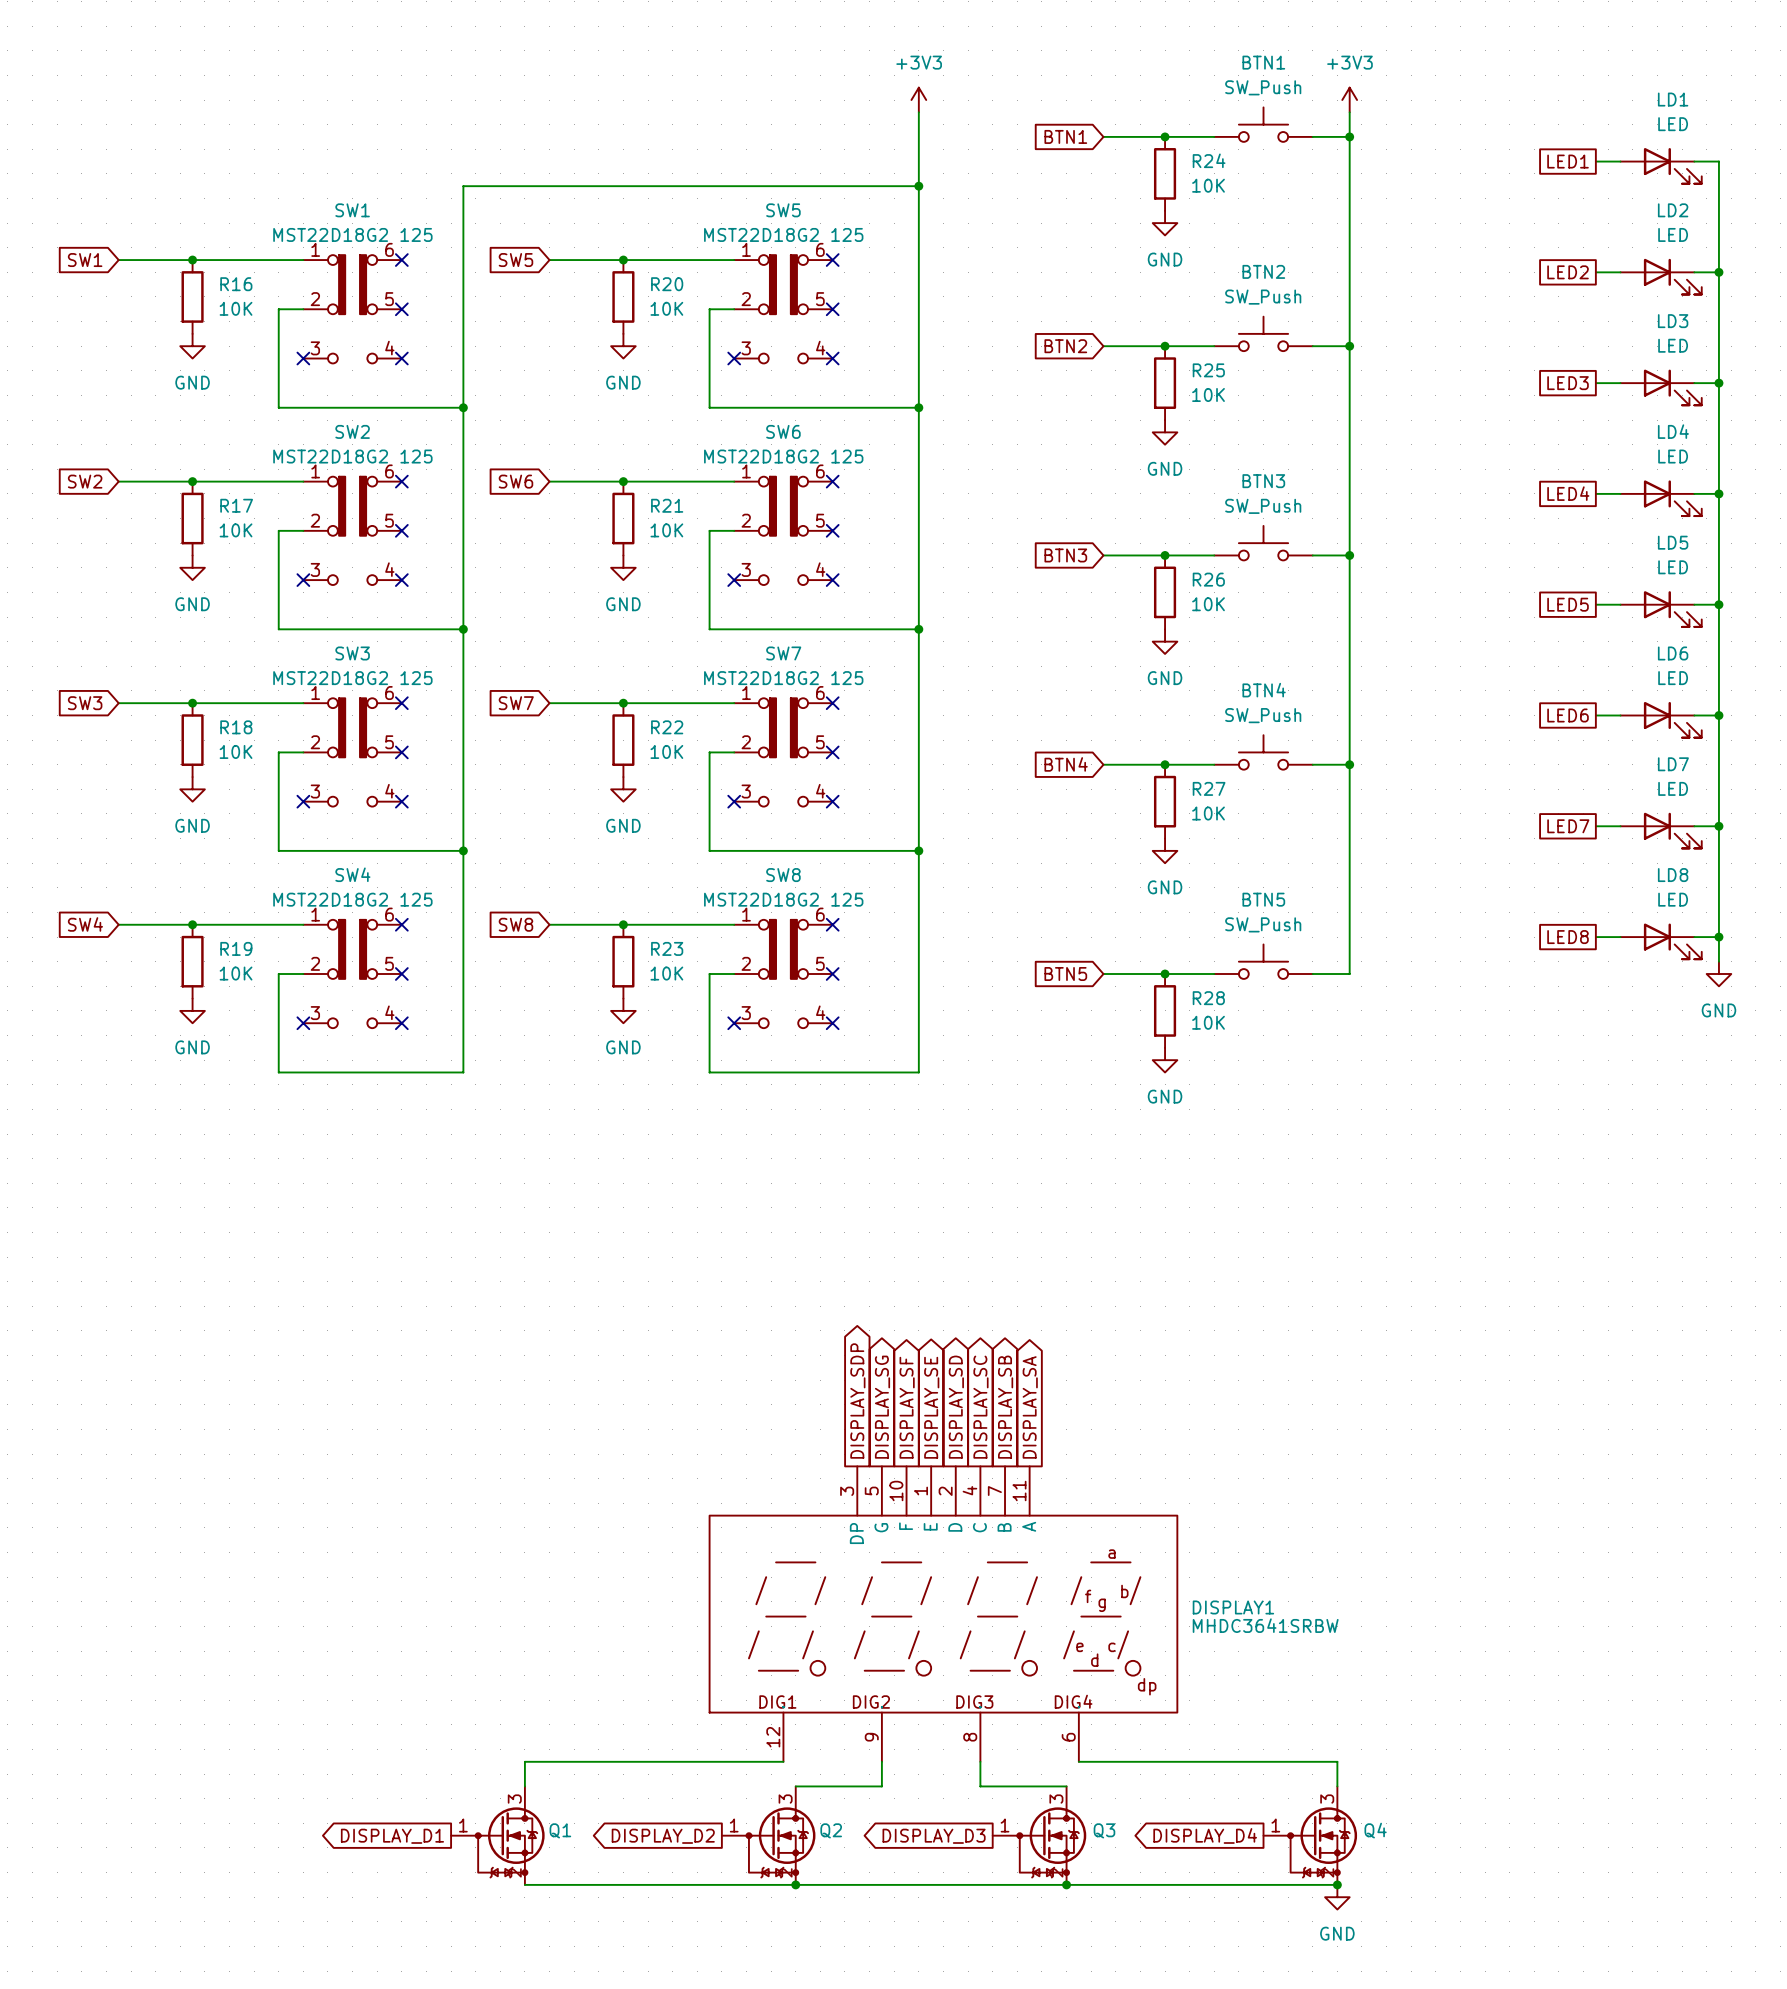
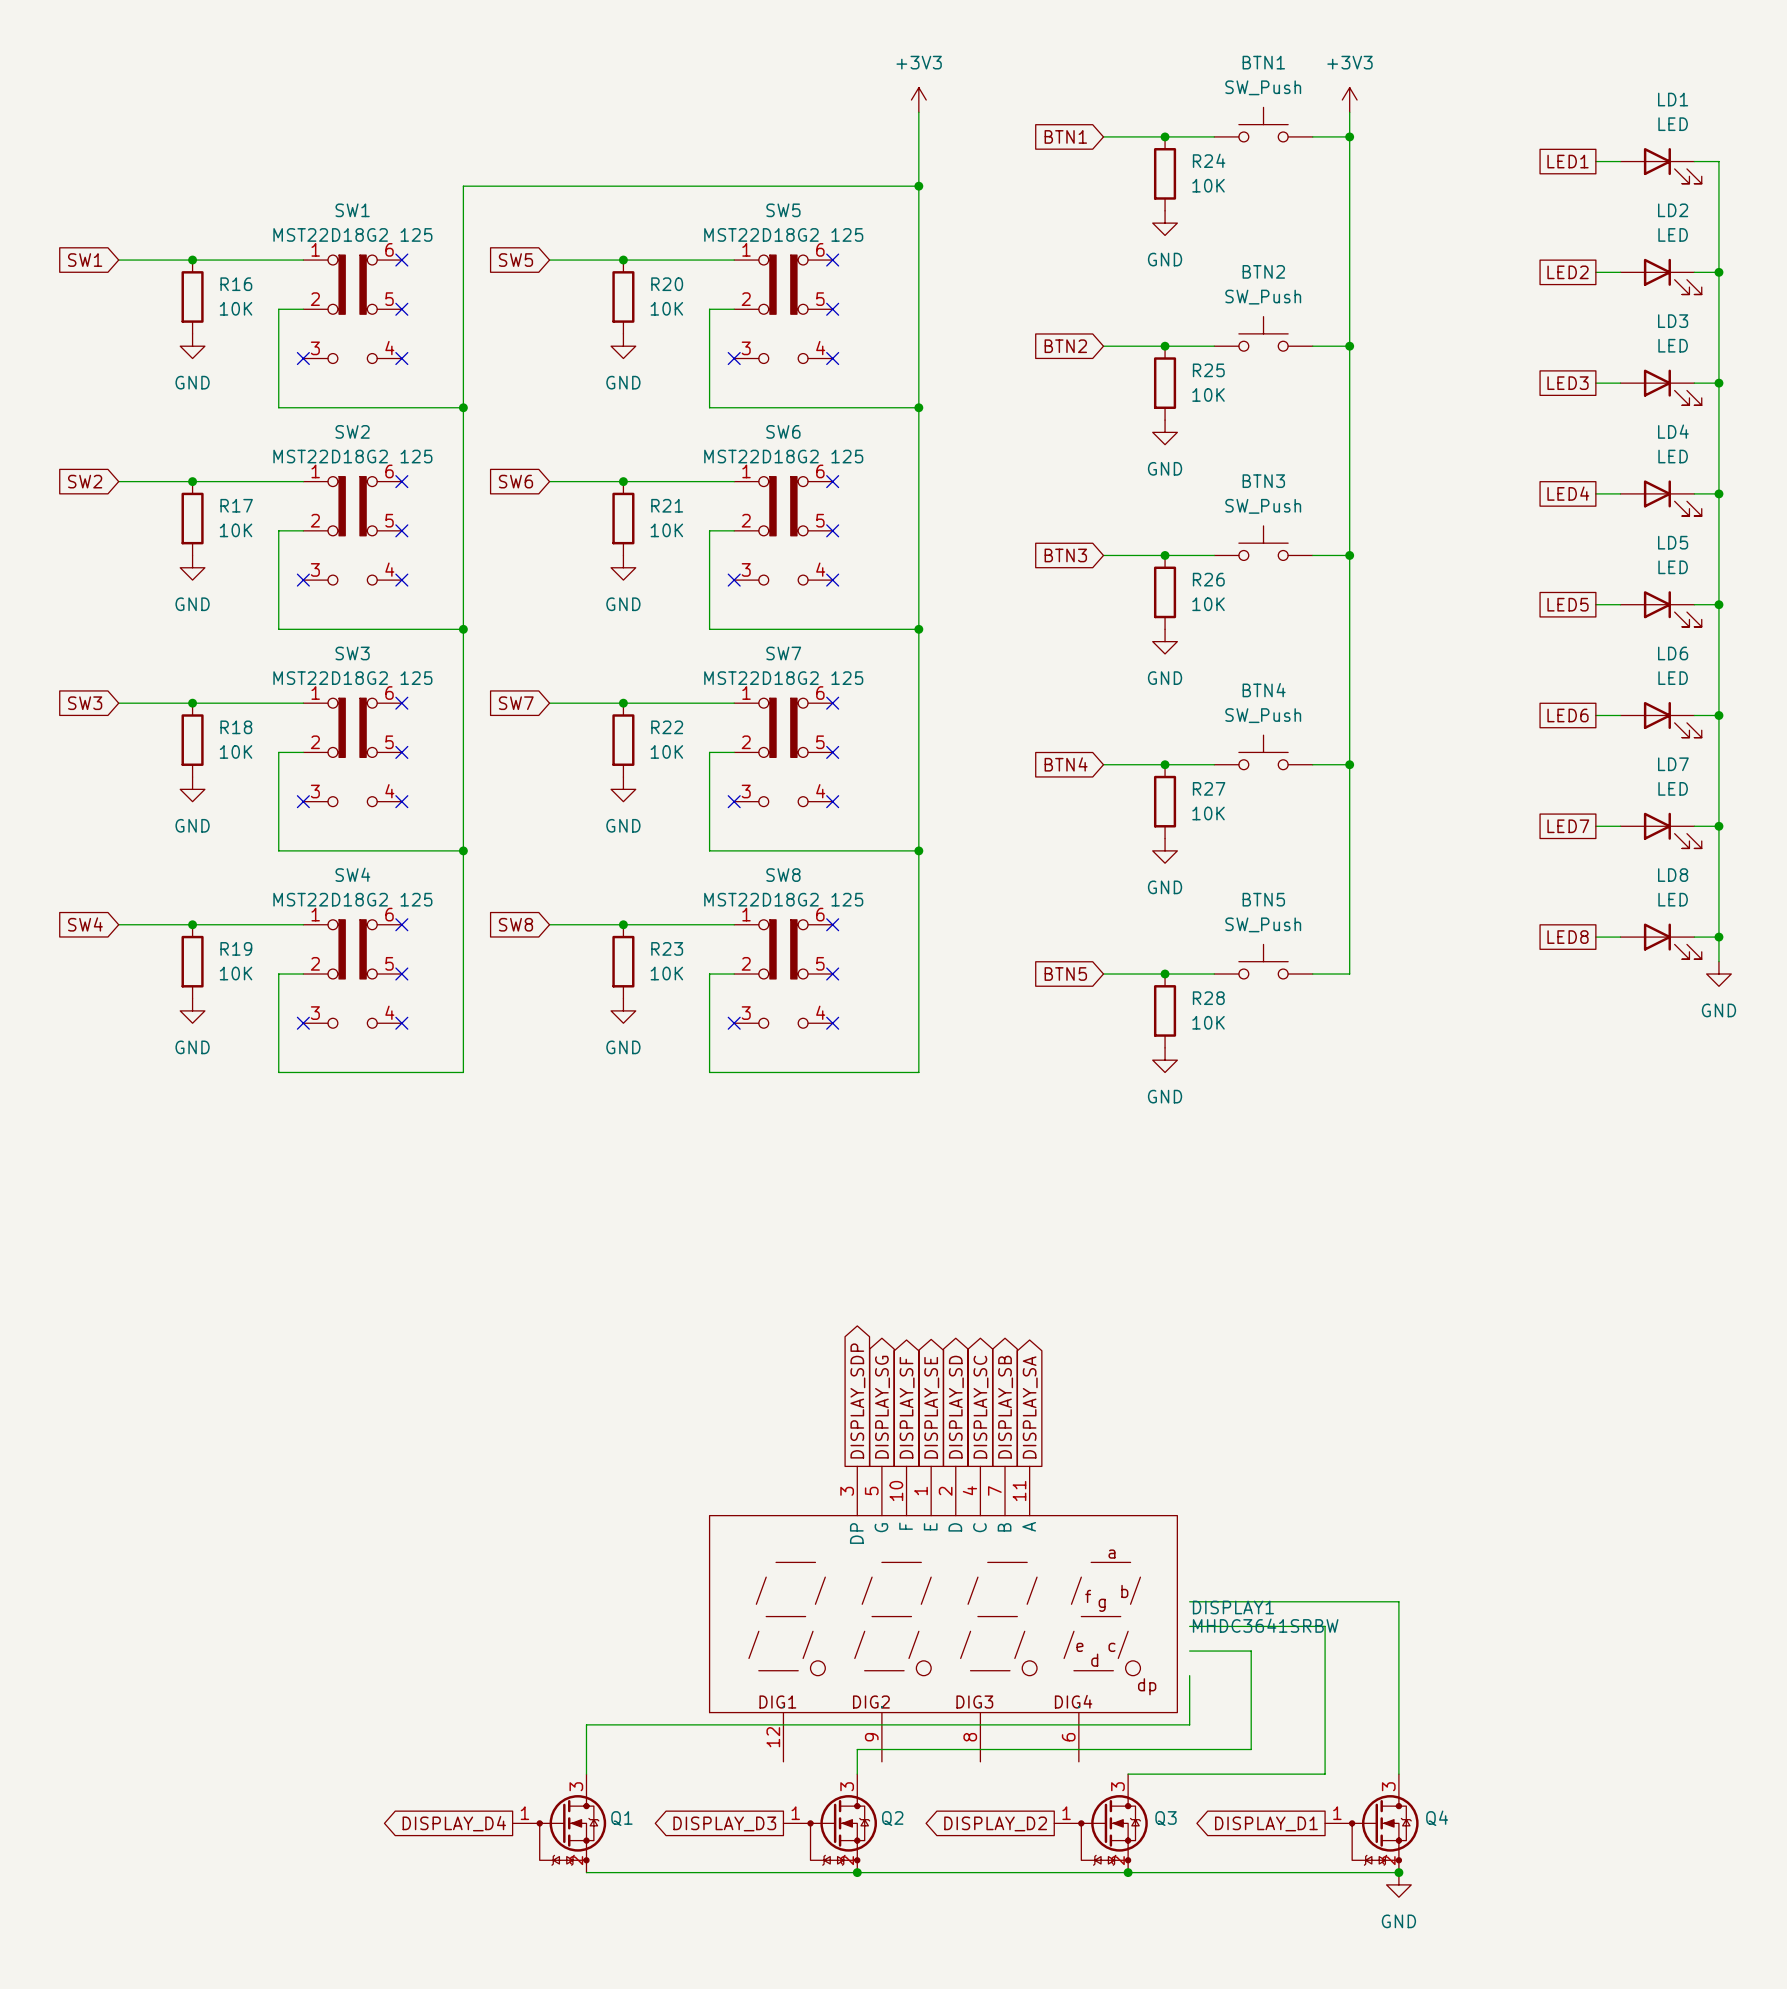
wire: none -> (1189, 1601) (1398, 1601) (1398, 1774)
wire: none -> (1189, 1626) (1325, 1626) (1325, 1774) (1128, 1774)
wire: none -> (1189, 1651) (1251, 1651) (1251, 1749) (857, 1749) (857, 1774)
wire: none -> (1189, 1675) (1189, 1724) (586, 1724) (586, 1774)
wire: (783, 1761) (524, 1761) (524, 1786) -> none
wire: (881, 1761) (881, 1786) (795, 1786) -> none
wire: (980, 1761) (980, 1786) (1066, 1786) -> none
wire: (1078, 1761) (1337, 1761) (1337, 1786) -> none
global label: none -> DISPLAY_D2 (995, 1823)
Q1 position: (497, 1835) -> (559, 1823)
Q2 position: (768, 1835) -> (830, 1823)
Q3 position: (1039, 1835) -> (1101, 1823)
global label: DISPLAY_D4 (1205, 1835) -> DISPLAY_D1 (1266, 1823)
Q4 position: (1310, 1835) -> (1371, 1823)
global label: DISPLAY_D1 (392, 1836) -> DISPLAY_D4 (454, 1823)
global label: DISPLAY_D2 (663, 1836) -> none
global label position: DISPLAY_D3 (934, 1836) -> DISPLAY_D3 (724, 1823)
junction: none -> (857, 1872)
junction: none -> (1128, 1872)
junction: none -> (1398, 1872)
wire: (524, 1884) (1337, 1884) -> (586, 1872) (1398, 1872)
junction: (795, 1884) -> none
junction: (1066, 1884) -> none
junction: (1337, 1884) -> none
power symbol position: GND (1337, 1897) -> GND (1398, 1884)

